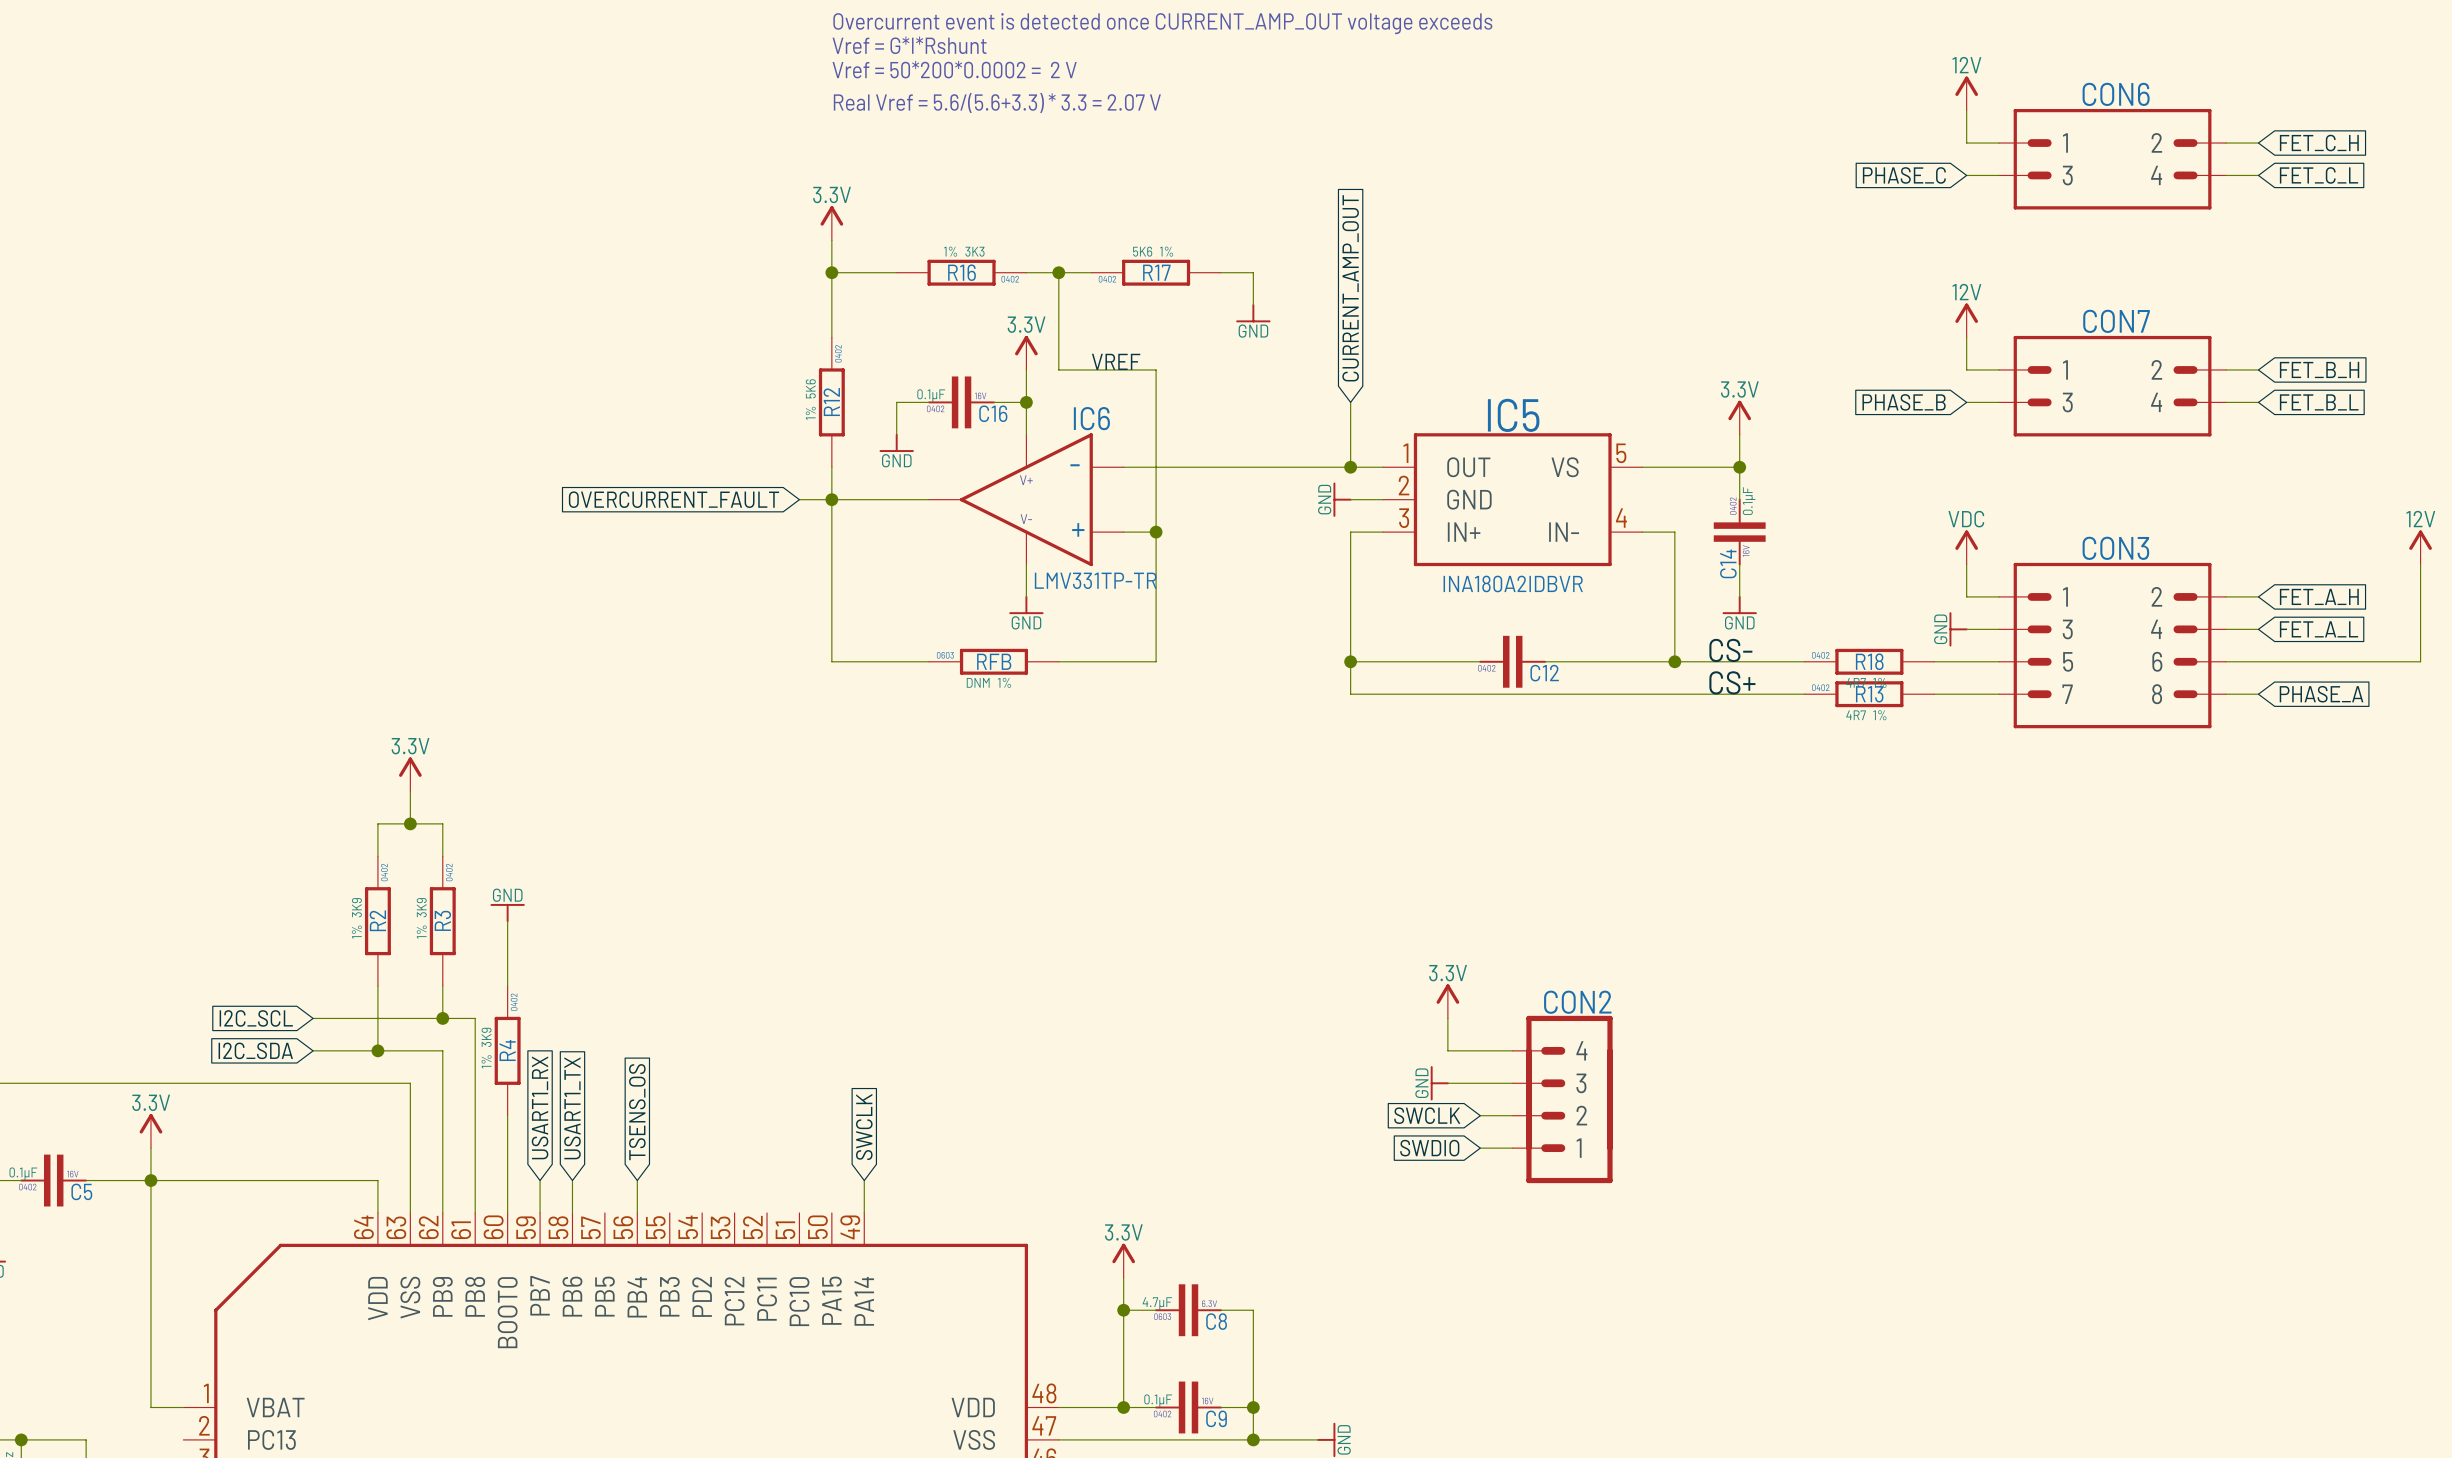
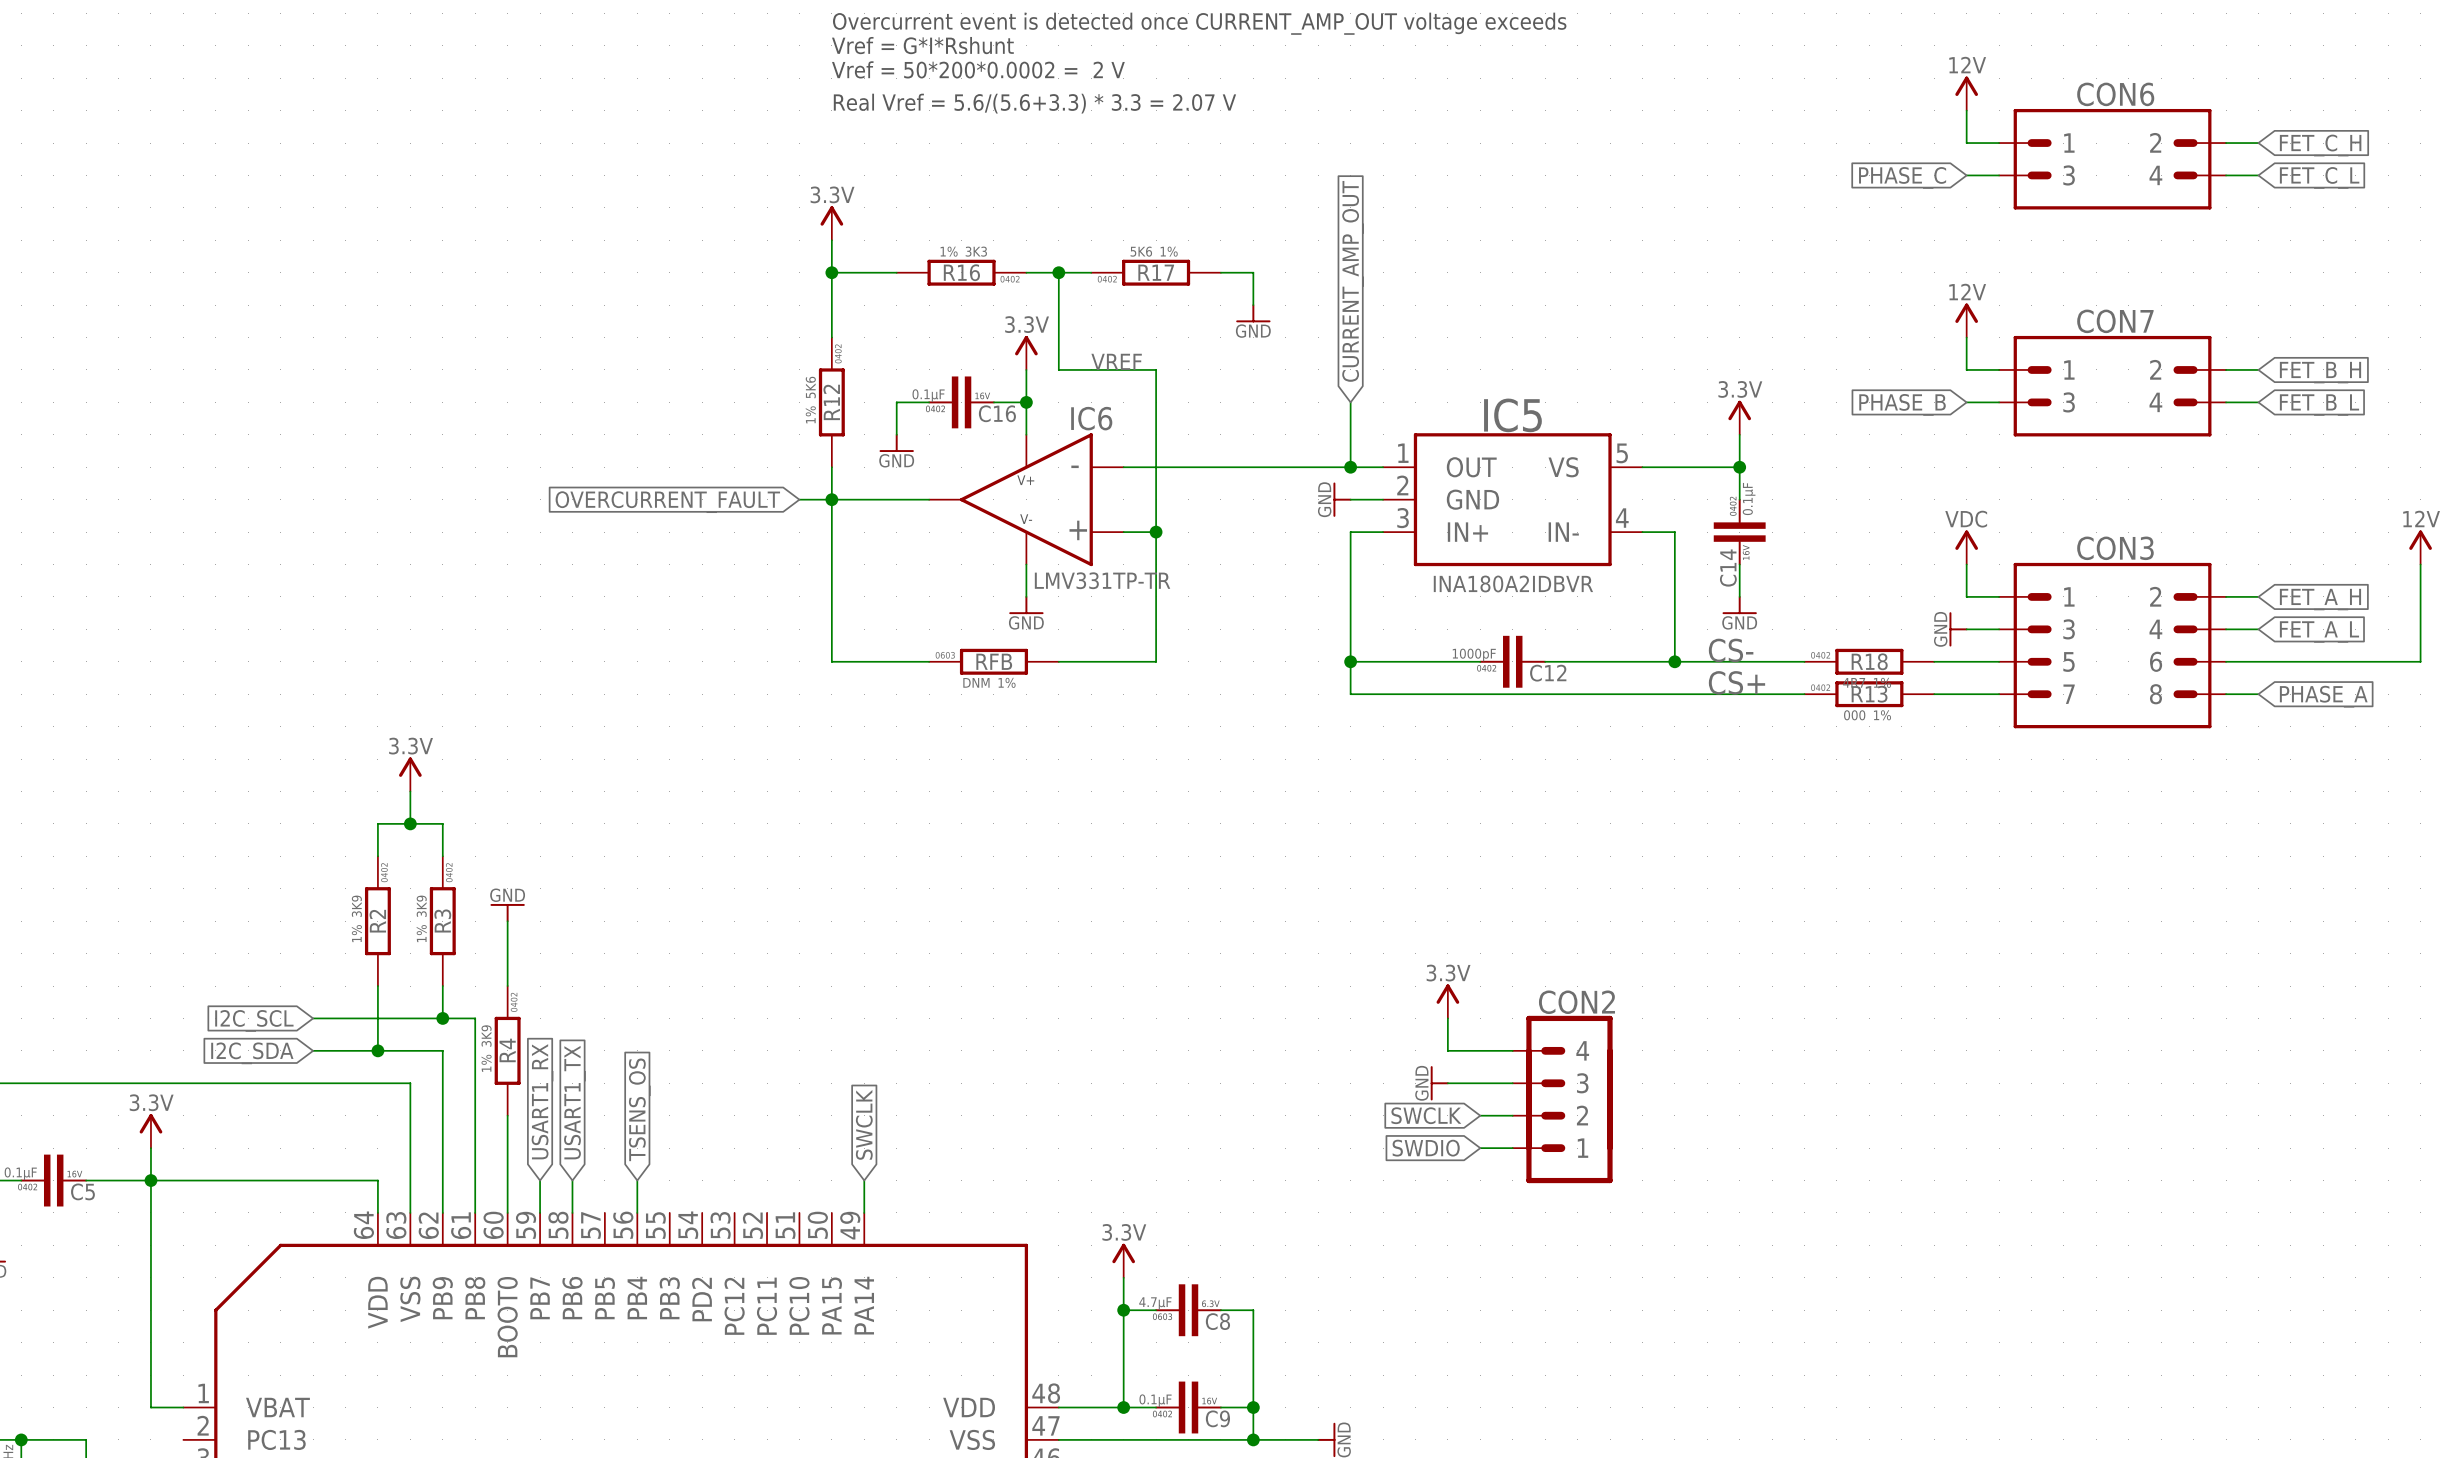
C12 value: none -> 1000pF (1474, 654)
R13 value: 4R7 (1856, 715) -> 000 (1854, 715)

